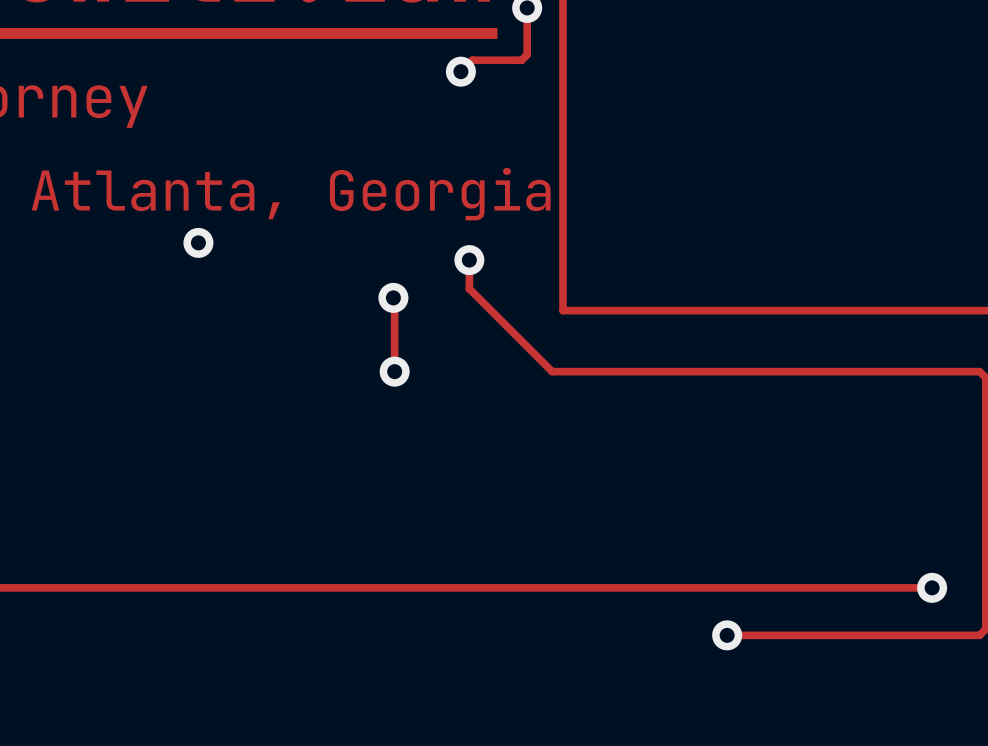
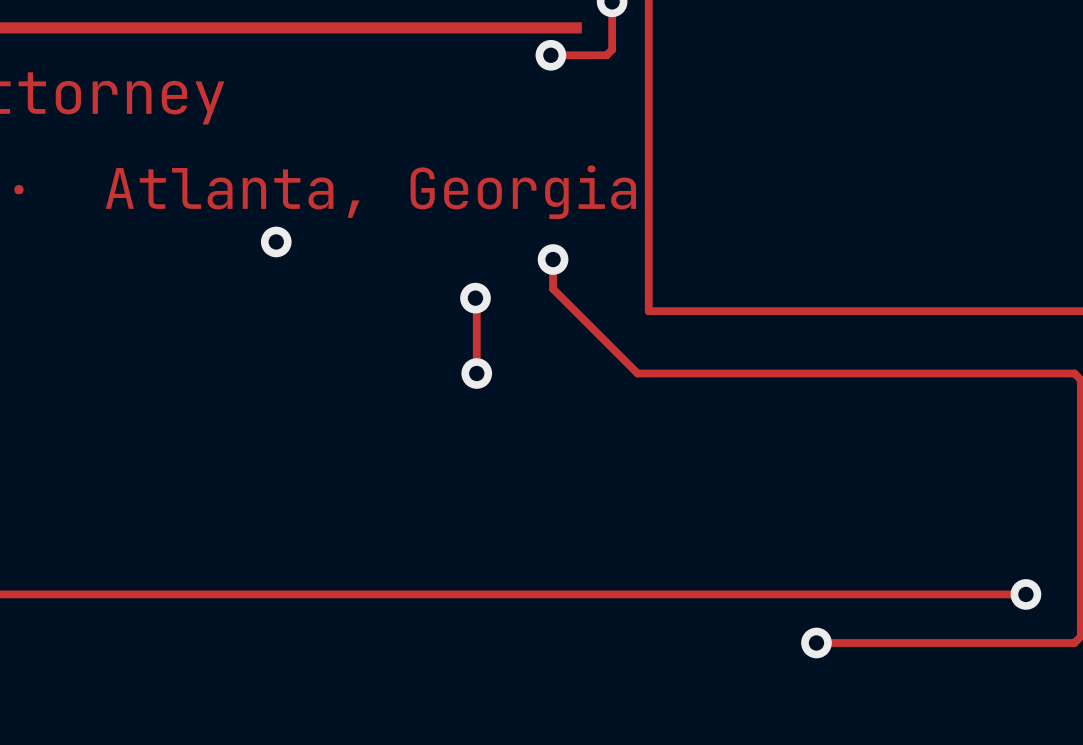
via position: (460, 71) -> (550, 55)

